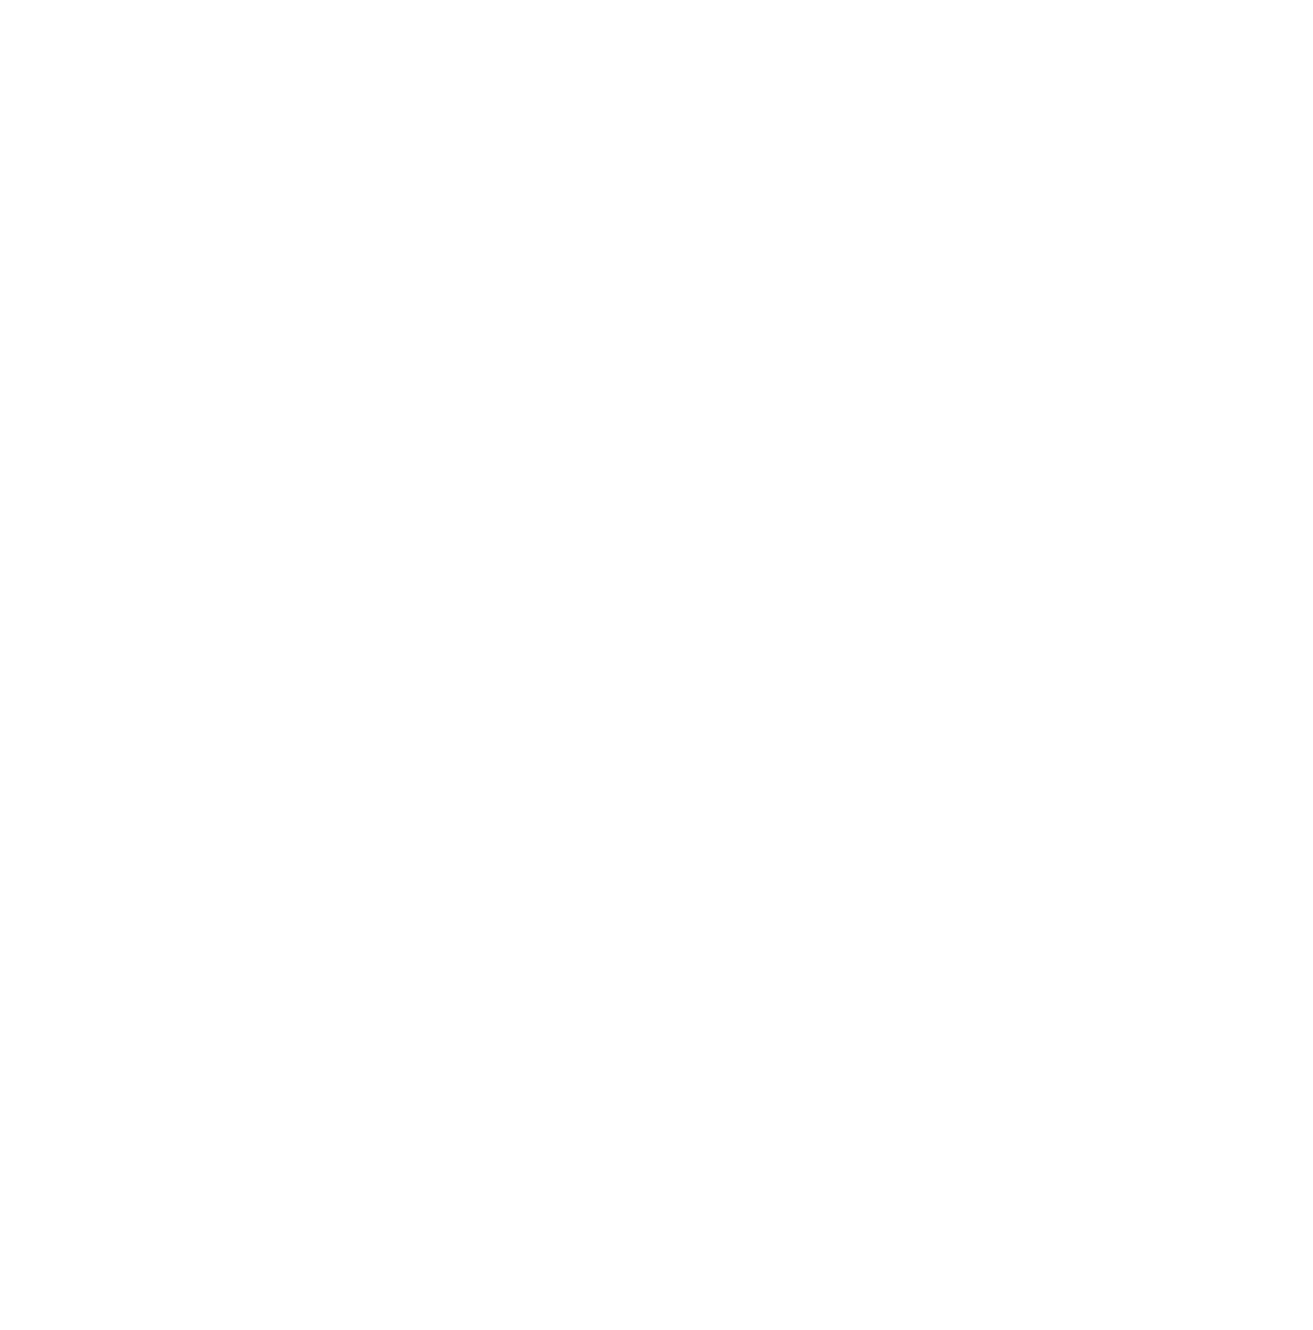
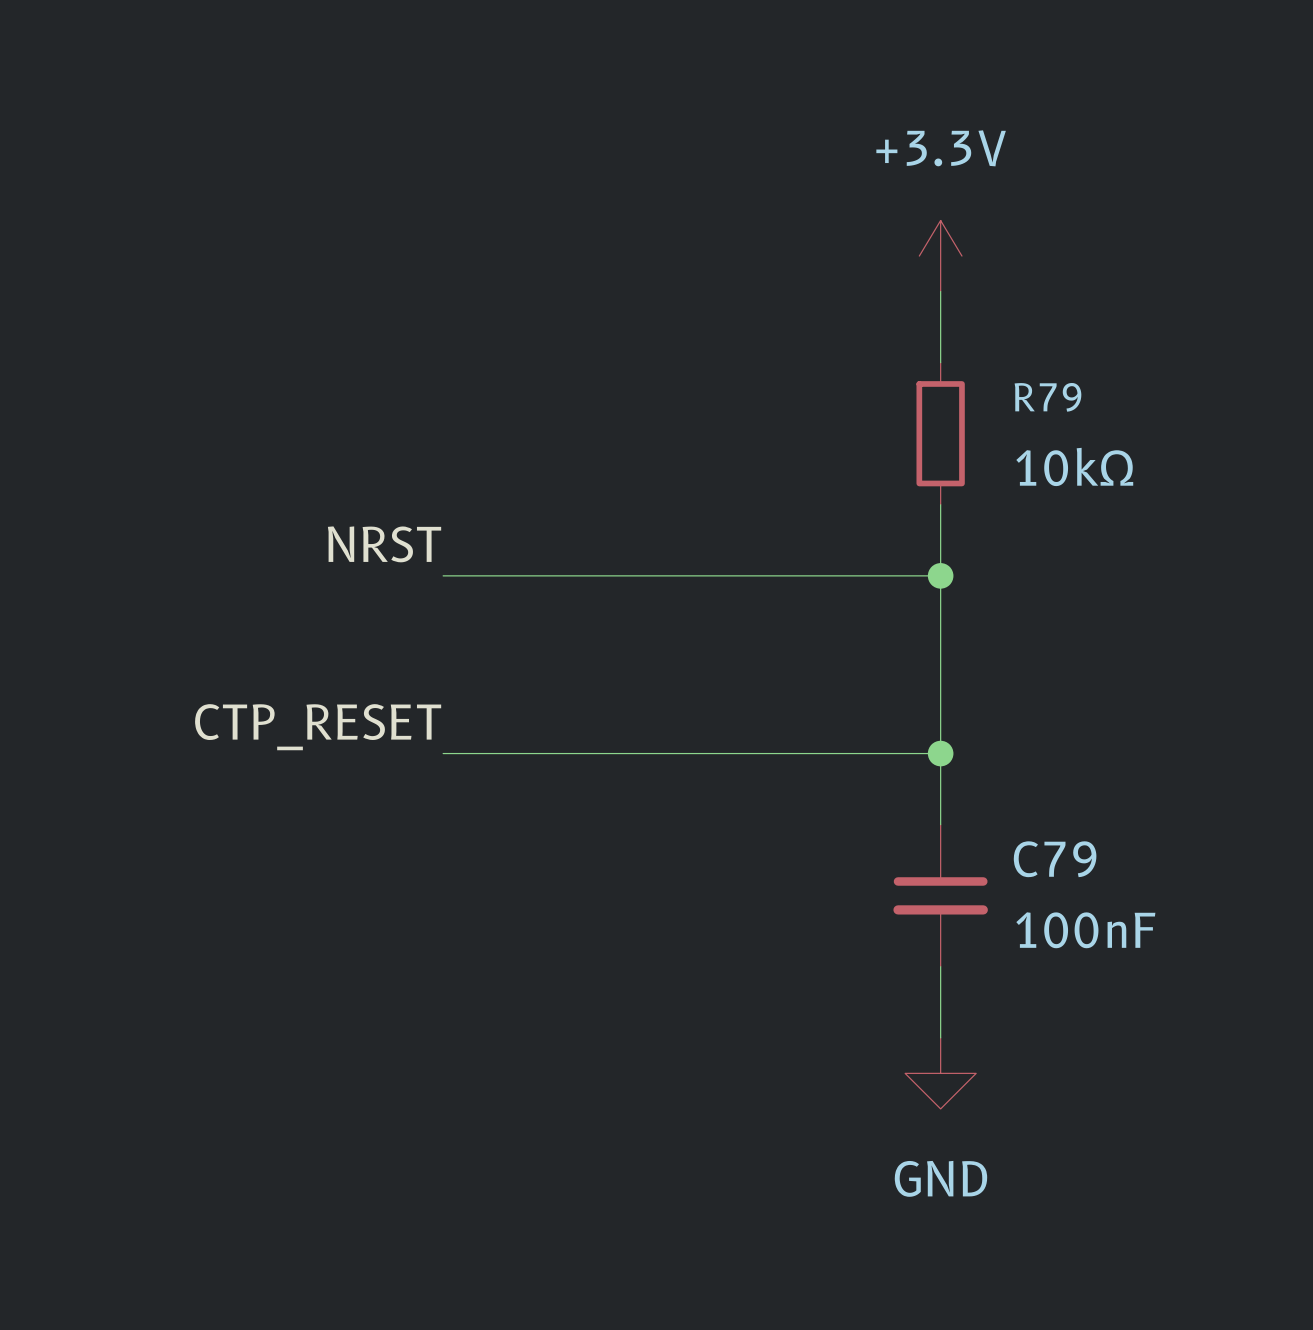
power symbol: none -> +3.3V (940, 256)
wire: none -> (940, 291) (940, 362)
R79: none -> 10kΩ (940, 433)
wire: none -> (940, 504) (940, 824)
label: none -> NRST (384, 544)
wire: none -> (443, 575) (940, 575)
junction: none -> (940, 575)
label: none -> CTP_RESET (318, 727)
wire: none -> (443, 753) (940, 753)
junction: none -> (940, 753)
C79: none -> 100nF (940, 895)
wire: none -> (940, 966) (940, 1037)
power symbol: none -> GND (940, 1073)

